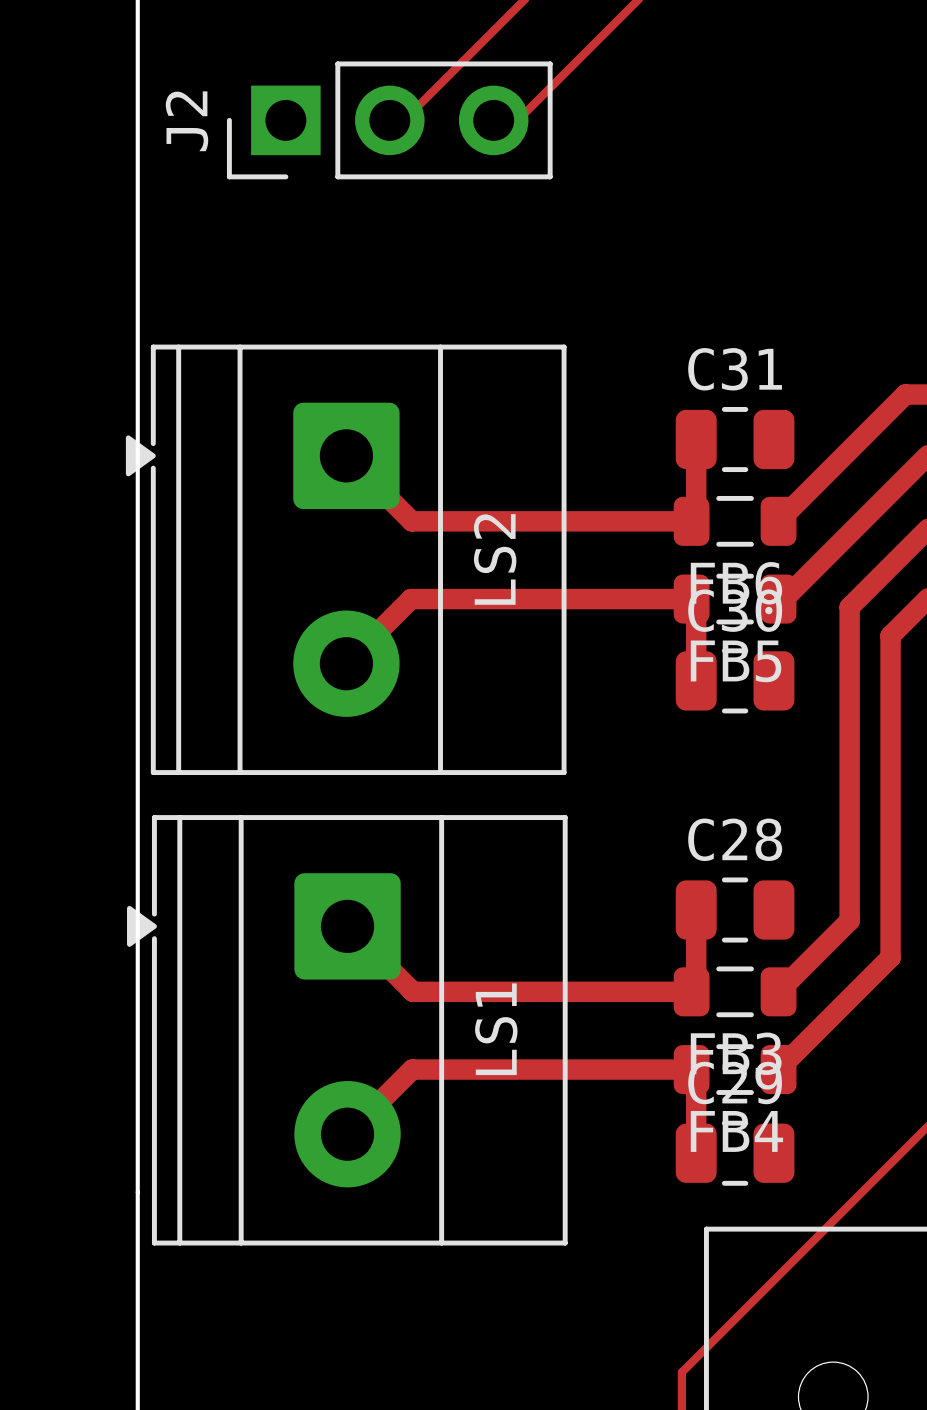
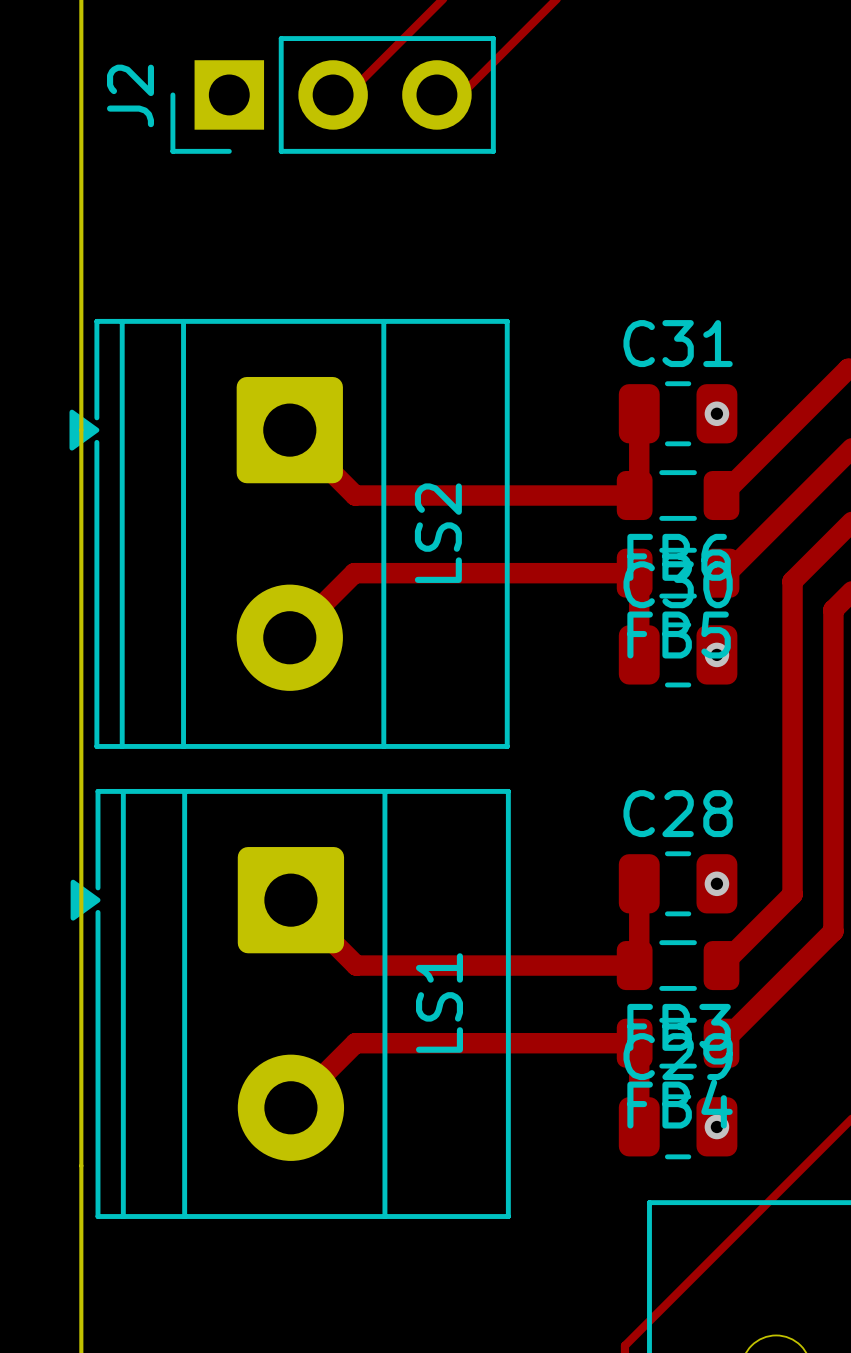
via: none -> (716, 413)
via: none -> (716, 654)
via: none -> (716, 883)
via: none -> (716, 1127)

